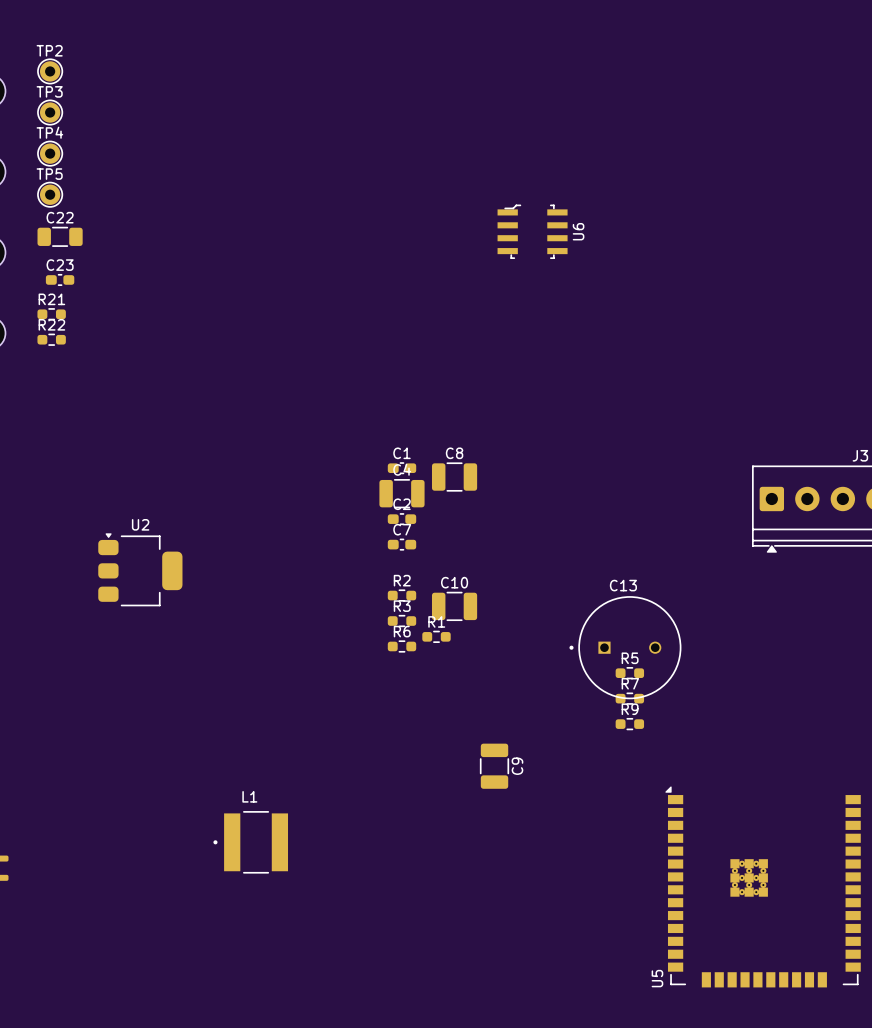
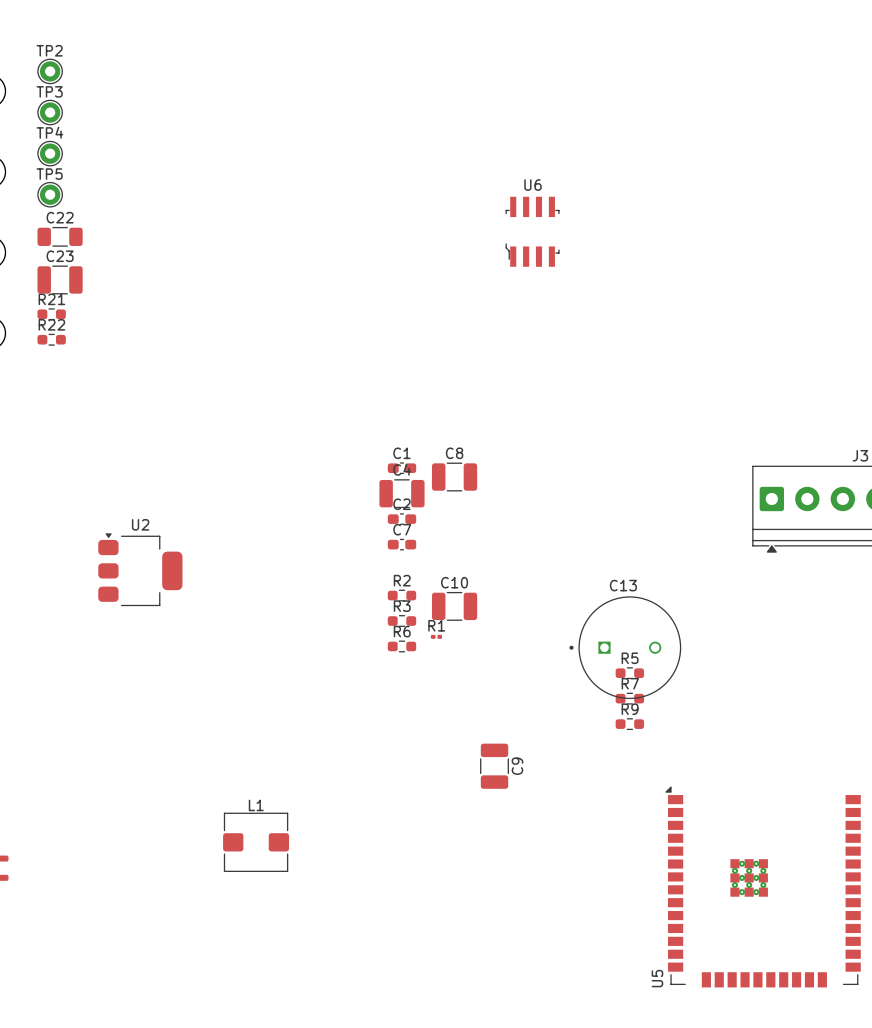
U6 rotation: 0° (532, 231) -> 90° counterclockwise (532, 231)
C23 footprint: [45, 274, 75, 286] -> [37, 265, 83, 295]
R1 footprint: [422, 630, 451, 643] -> [430, 634, 443, 639]
L1 footprint: [213, 811, 289, 874] -> [223, 812, 290, 872]

